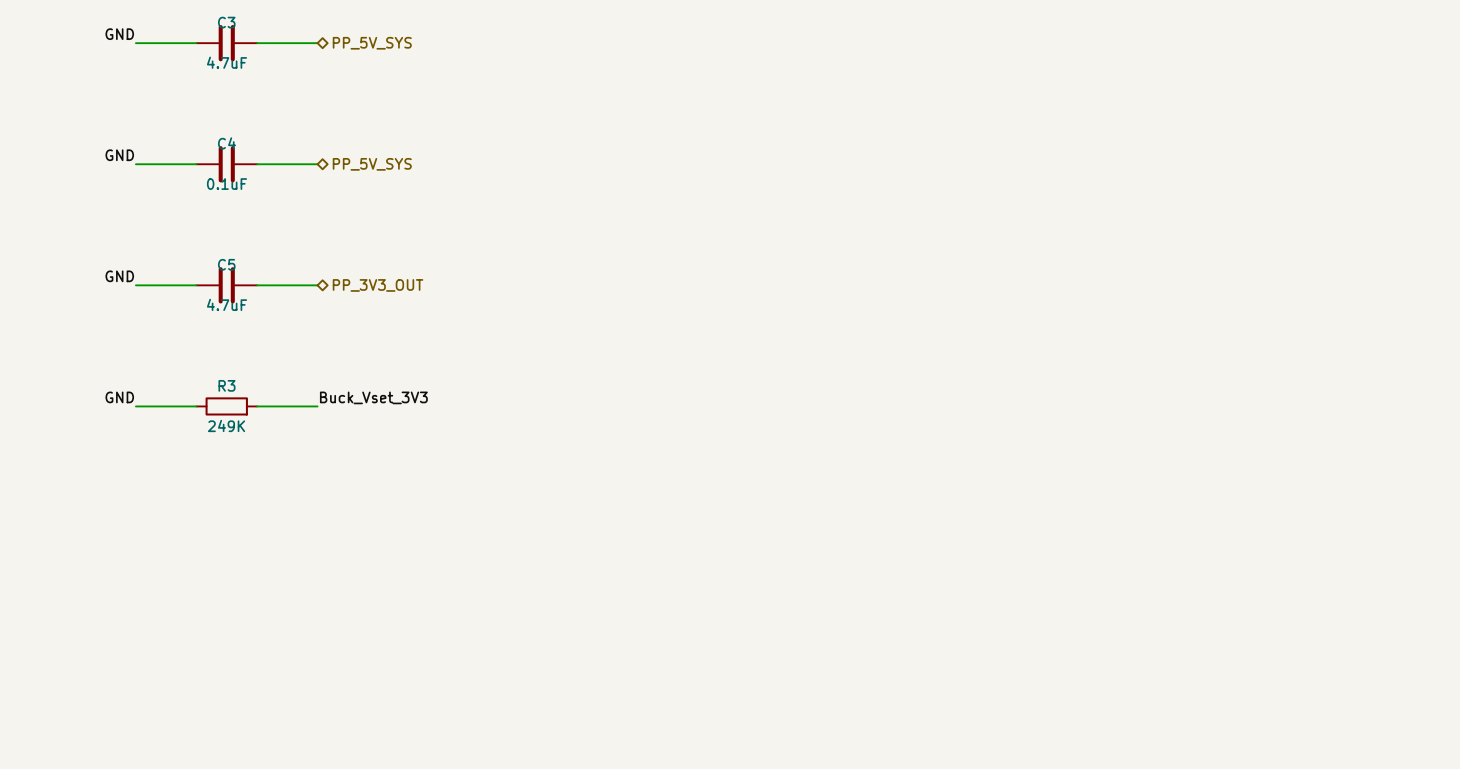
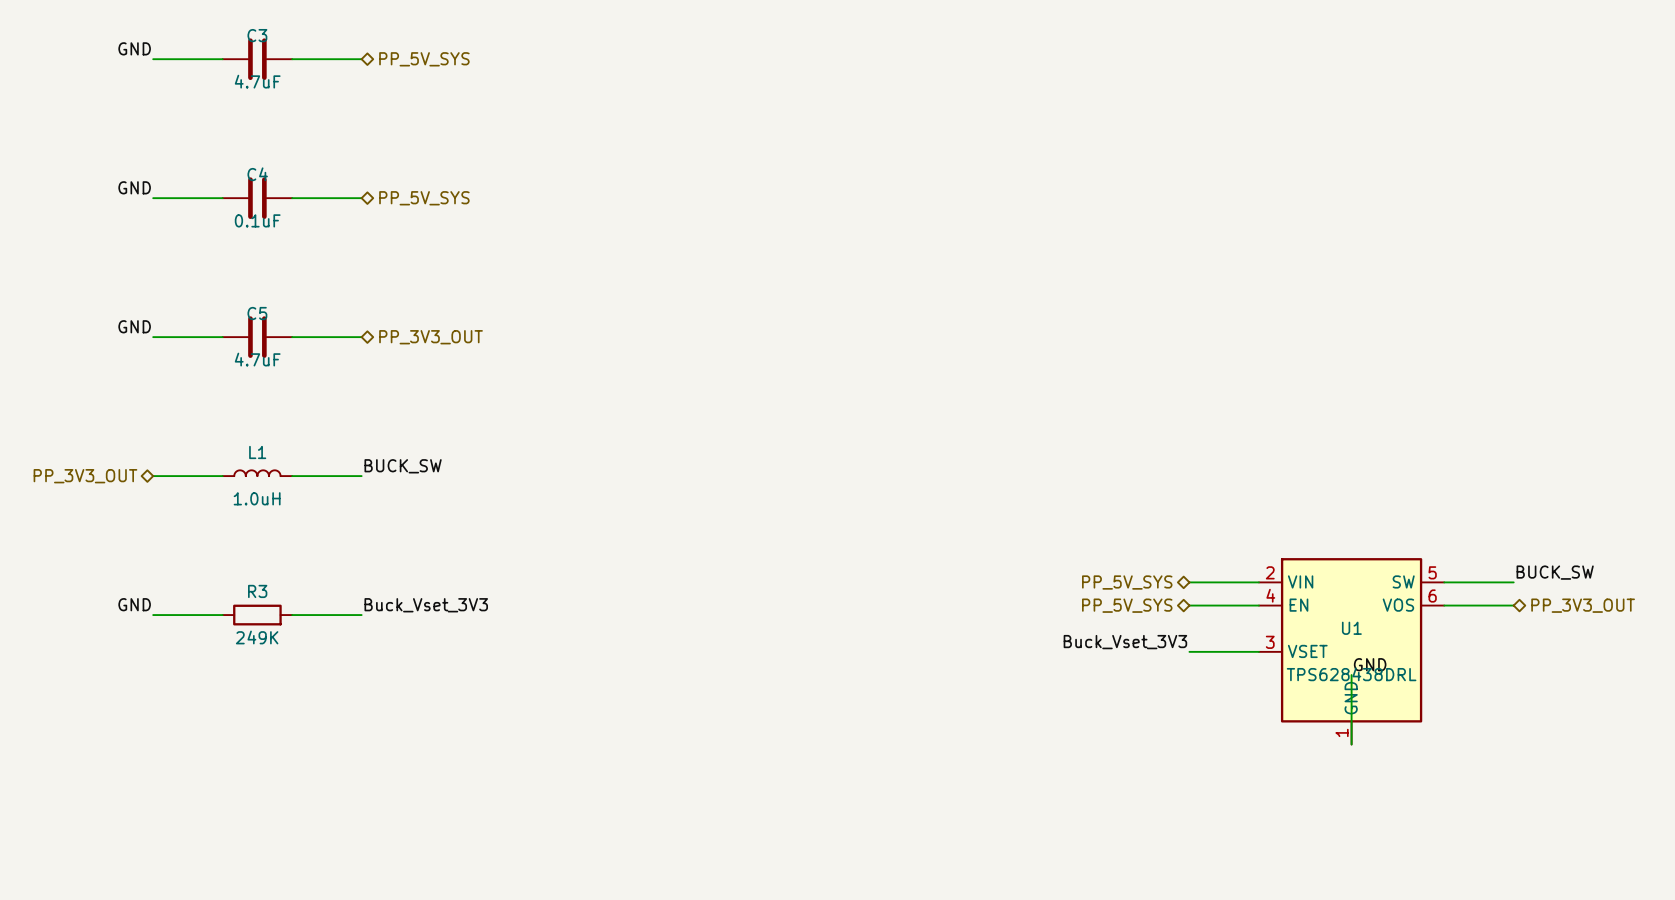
label position: GND (119, 397) -> GND (134, 604)
label: Buck_Vset_3V3 (373, 397) -> BUCK_SW (403, 466)
L1: none -> 1.0uH (257, 473)
hierarchical label: none -> PP_3V3_OUT (85, 476)
R3 position: (226, 406) -> (257, 615)
label: none -> BUCK_SW (1555, 572)
hierarchical label: none -> PP_5V_SYS (1127, 582)
wire: none -> (1189, 582) (1258, 582)
wire: none -> (1444, 582) (1513, 582)
label: none -> Buck_Vset_3V3 (426, 605)
hierarchical label: none -> PP_5V_SYS (1127, 605)
wire: none -> (1189, 605) (1258, 605)
wire: none -> (1444, 605) (1513, 605)
hierarchical label: none -> PP_3V3_OUT (1583, 605)
wire: none -> (153, 615) (222, 615)
wire: none -> (292, 615) (361, 615)
label: none -> Buck_Vset_3V3 (1125, 642)
wire: none -> (1189, 651) (1258, 651)
U1: none -> TPS628438DRL (1351, 651)
label: none -> GND (1370, 664)
wire: none -> (1351, 675) (1351, 744)

